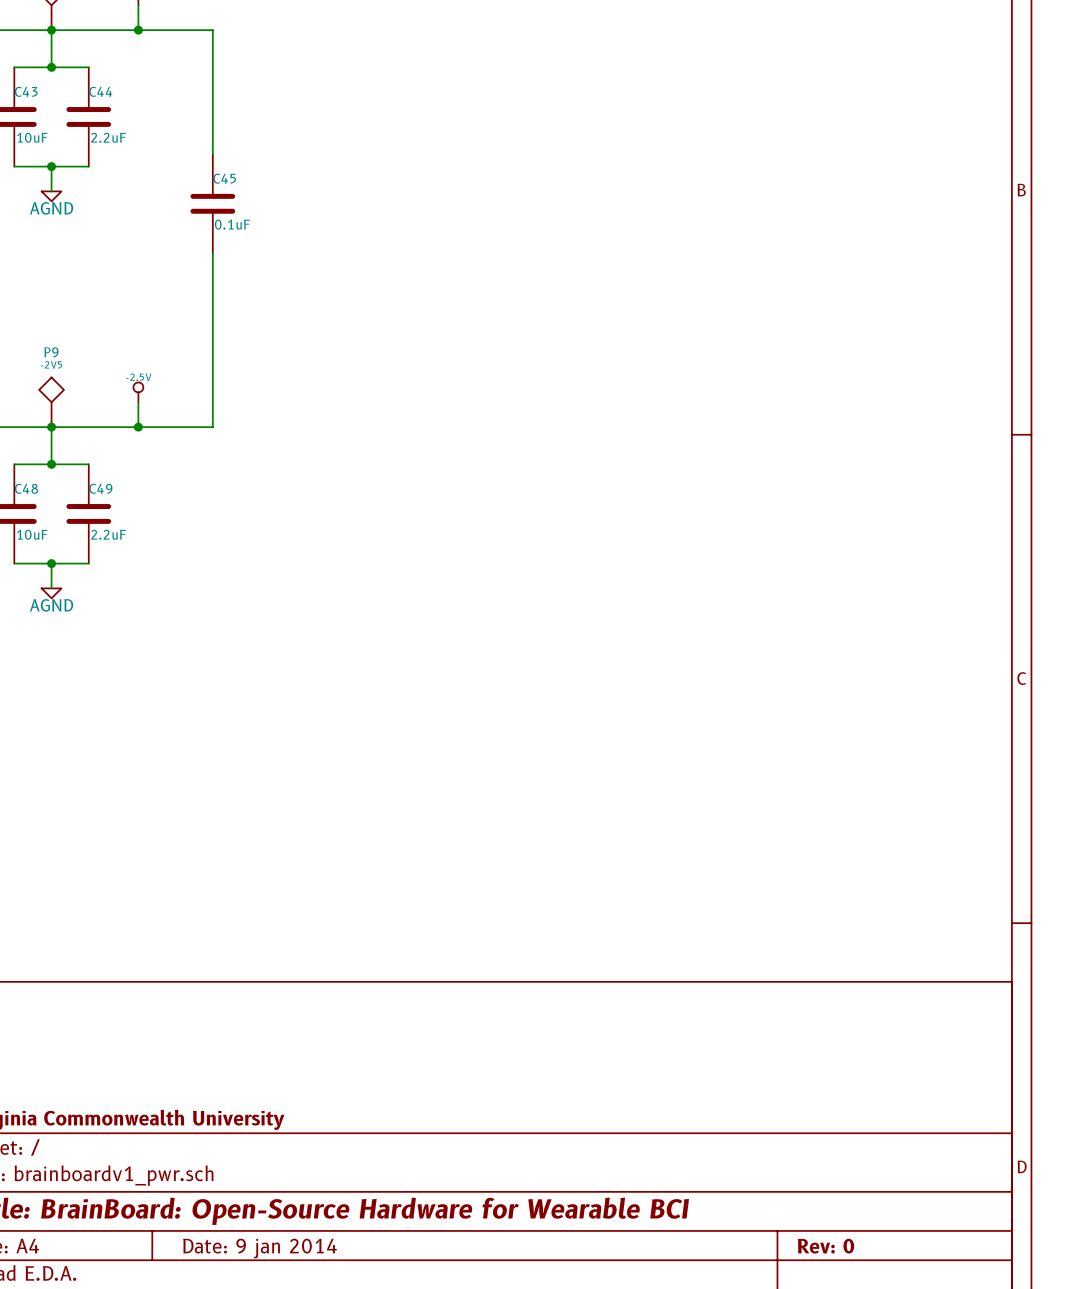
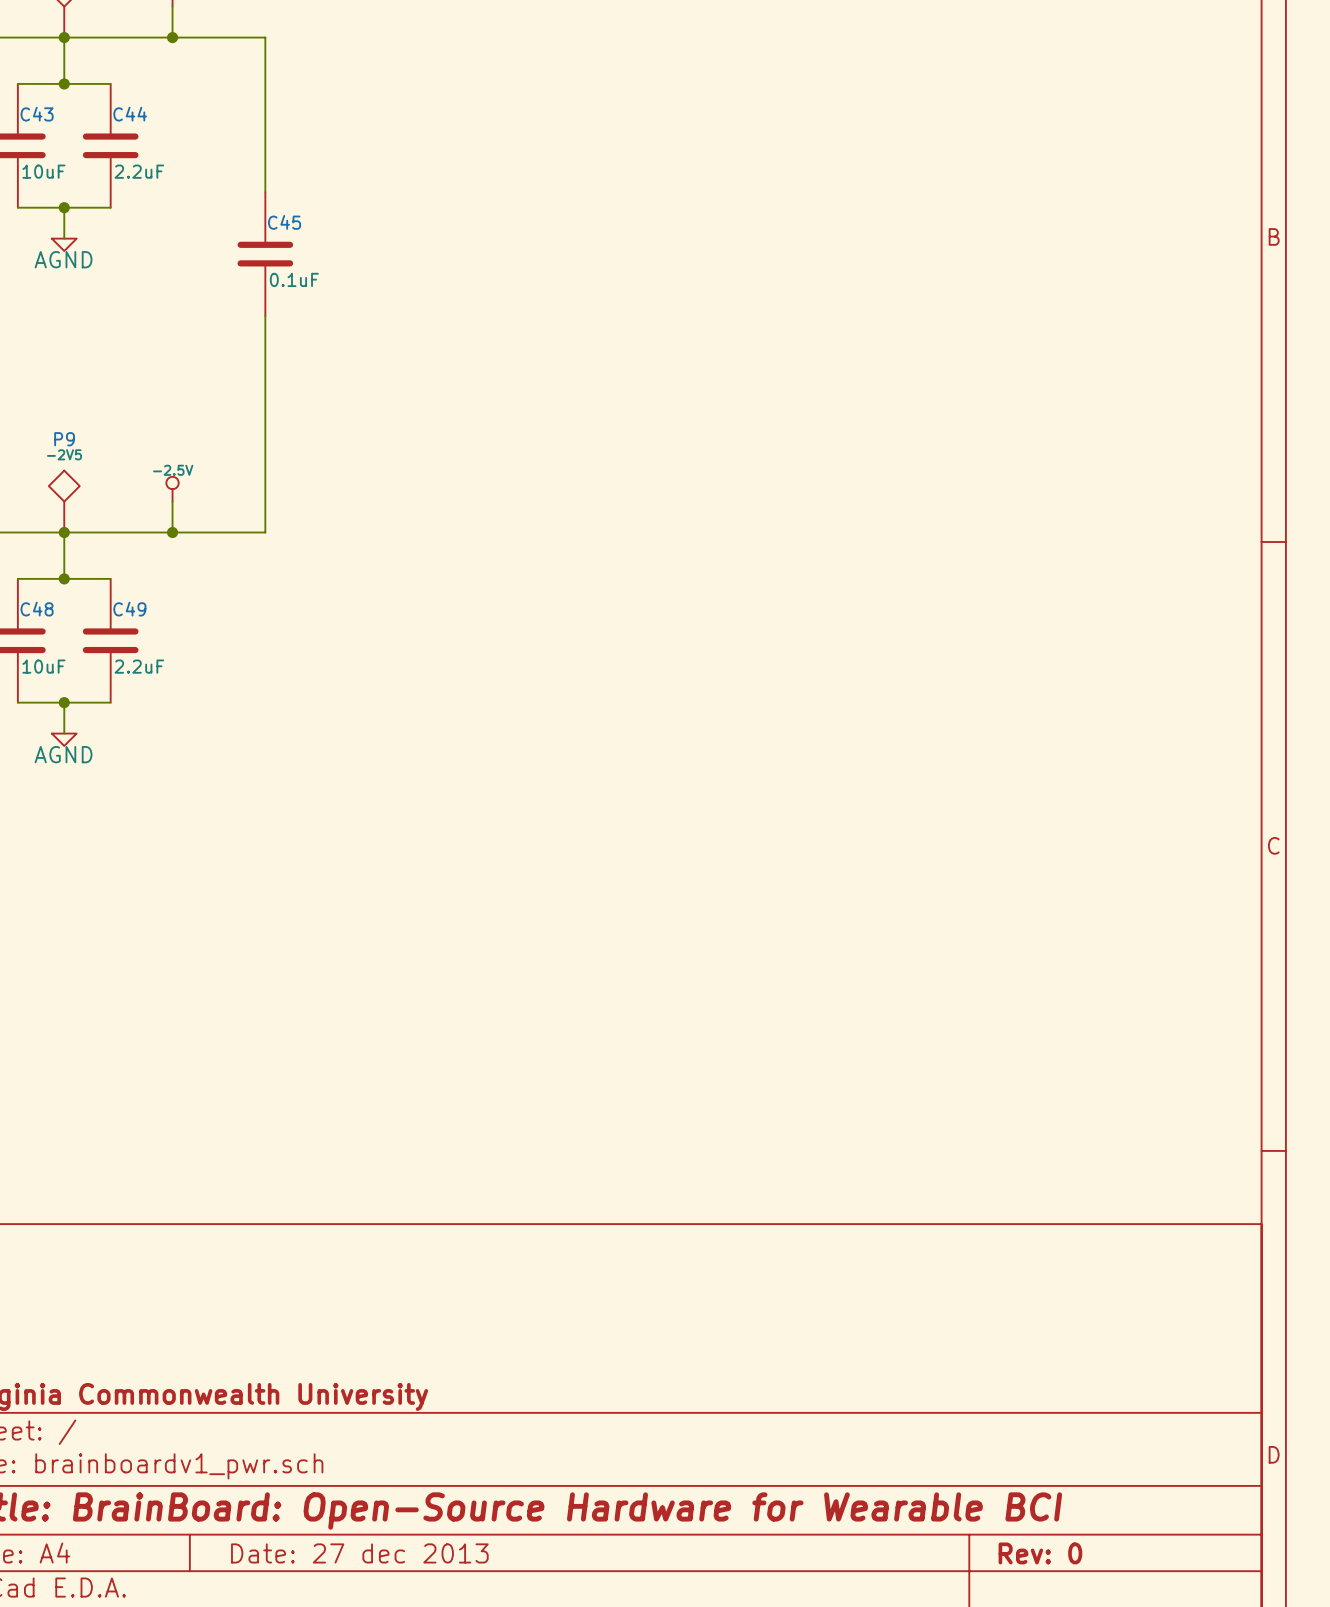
title block: Date: 9 jan 2014 (260, 1248) -> Date: 27 dec 2013 (359, 1553)

